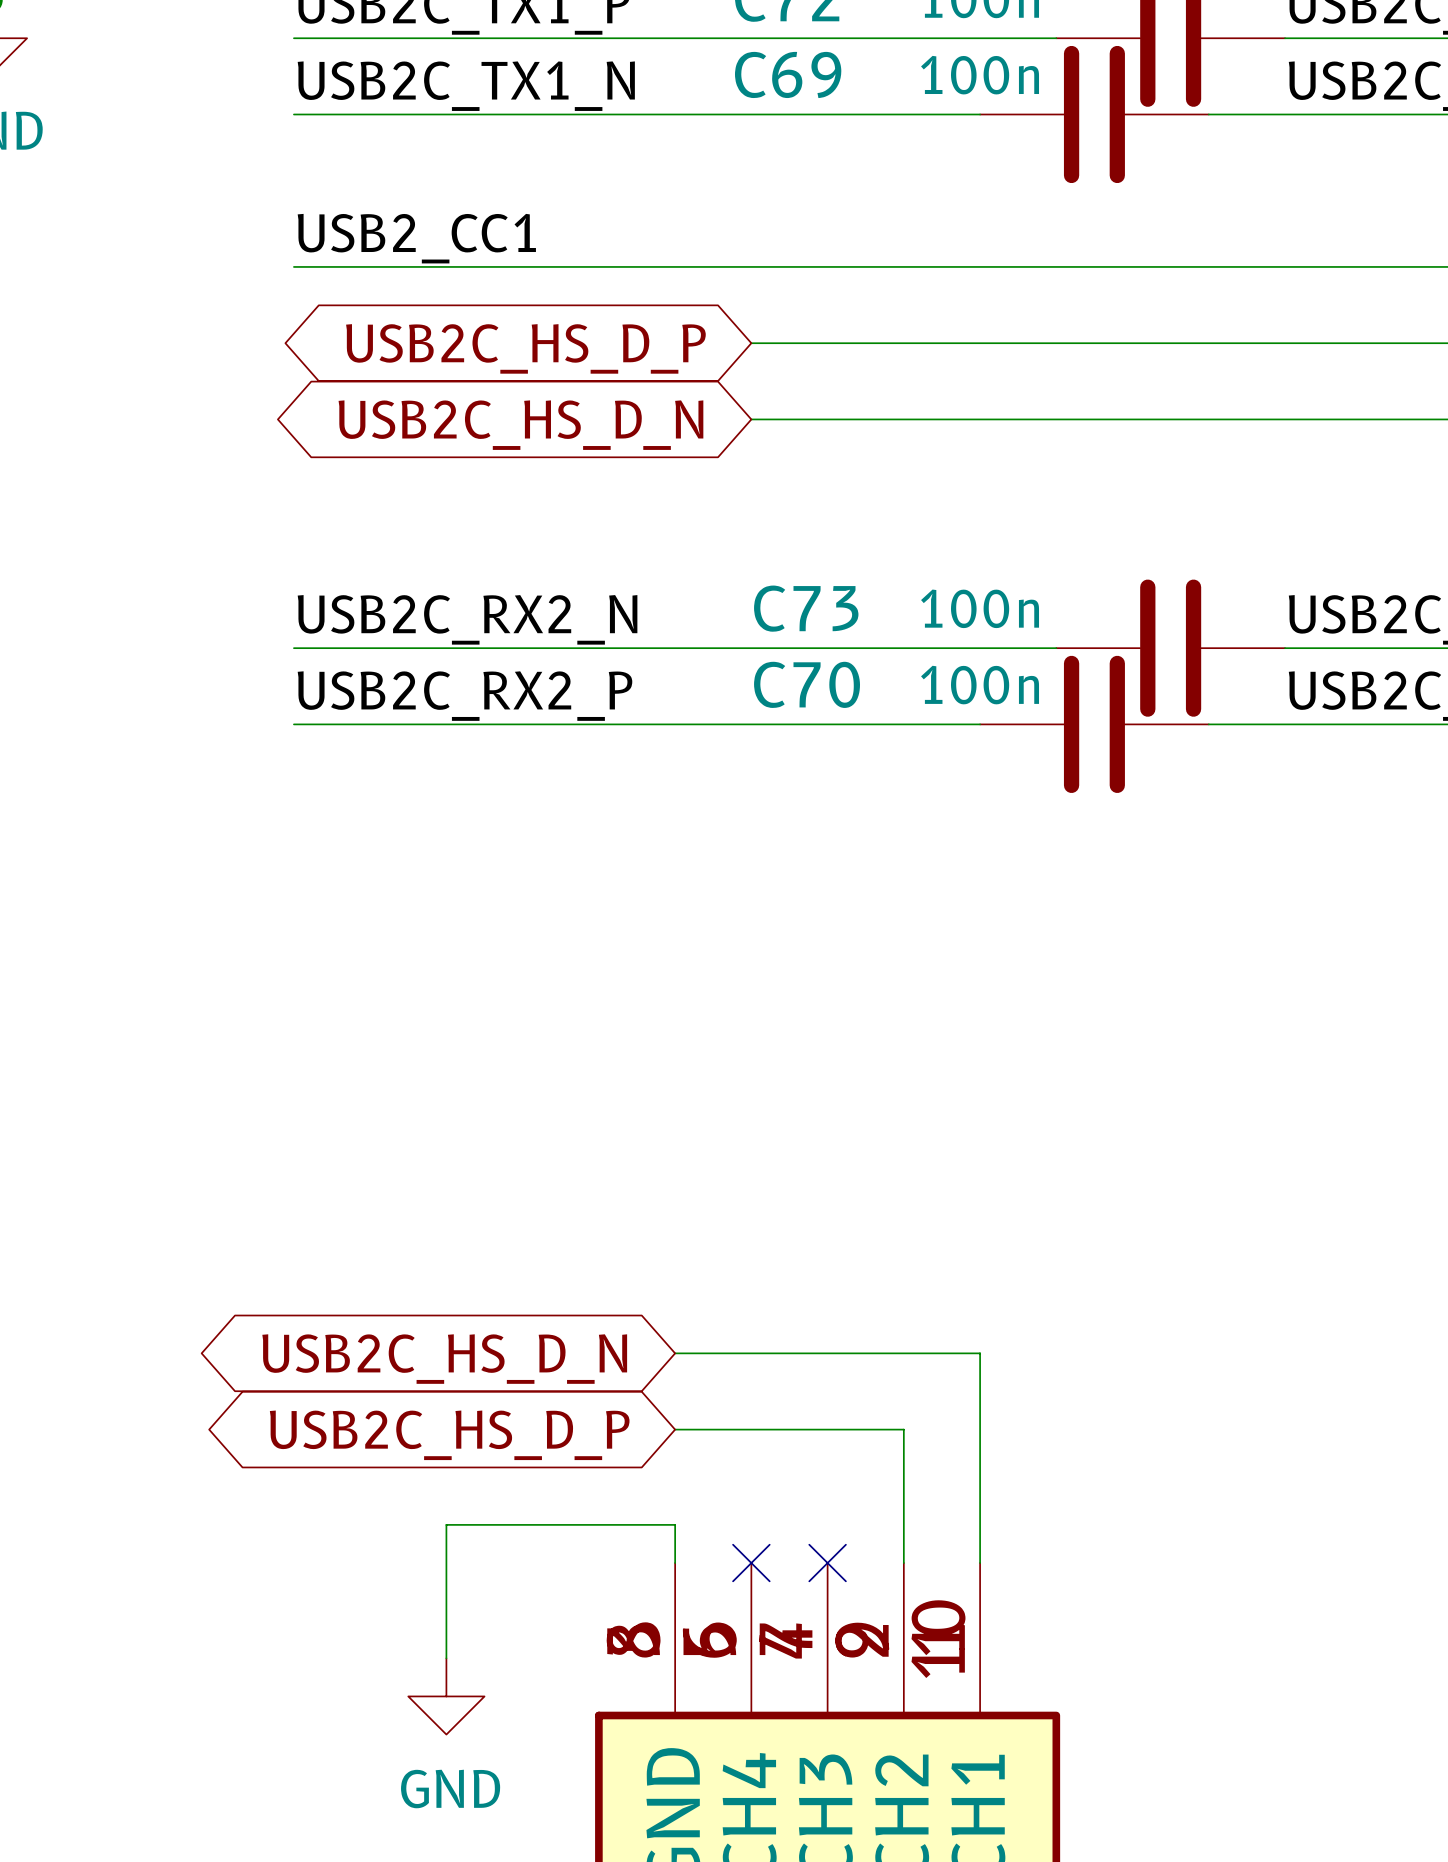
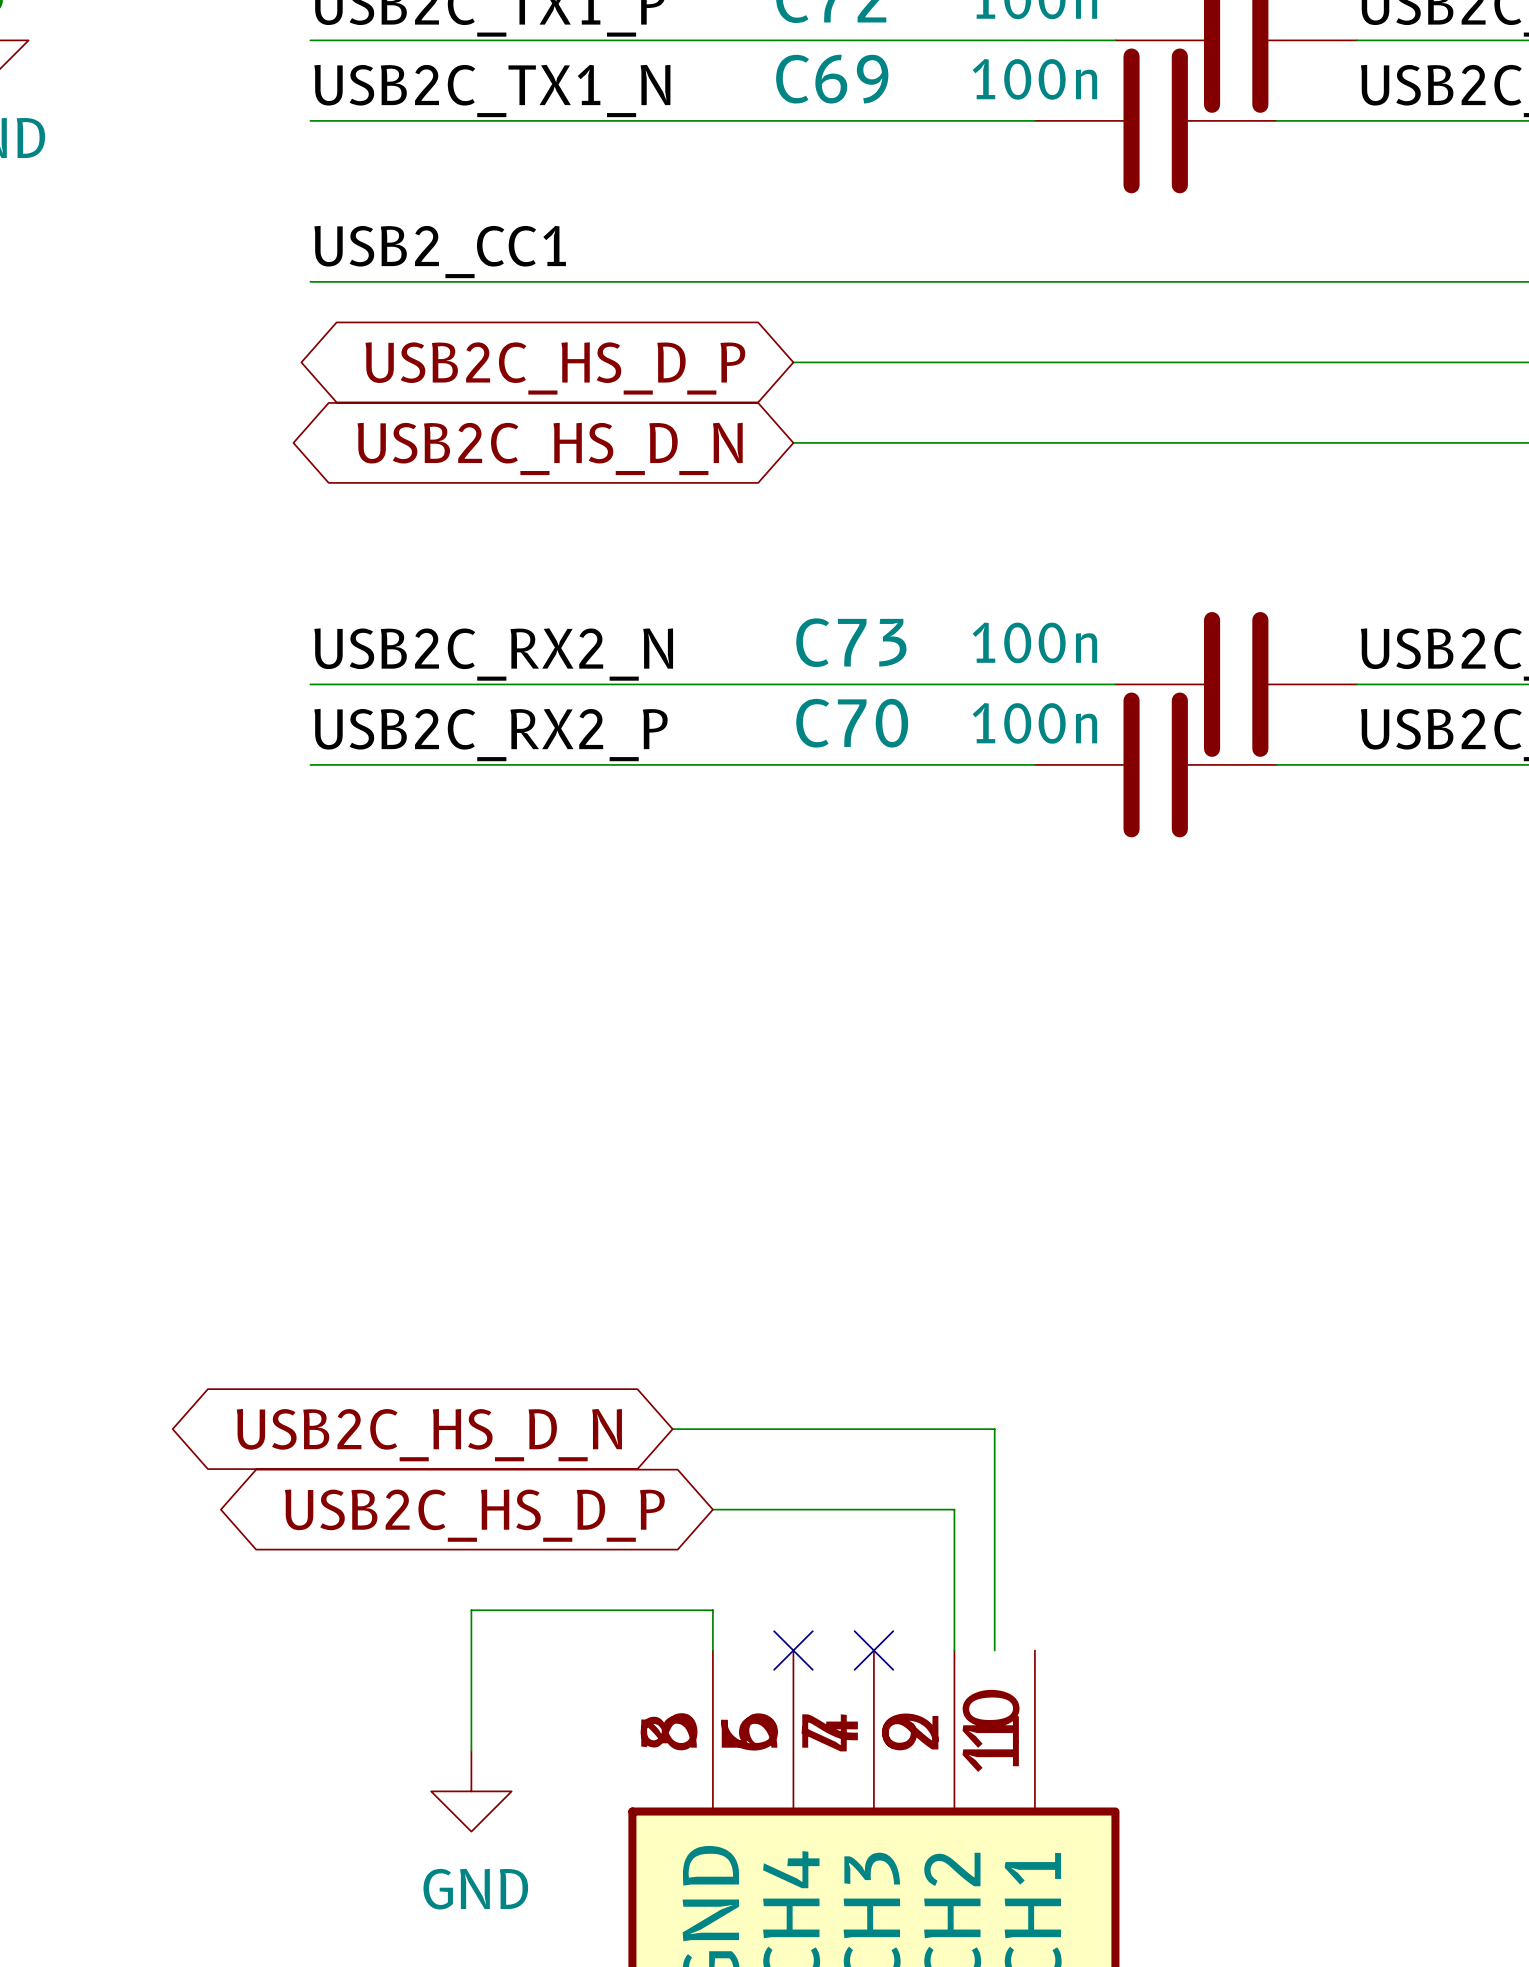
wire: none -> (672, 1429) (712, 1429)
wire: (941, 1353) (980, 1353) (980, 1563) -> (994, 1429) (994, 1650)
global label position: USB2C_HS_D_N (444, 1359) -> USB2C_HS_D_N (429, 1435)

